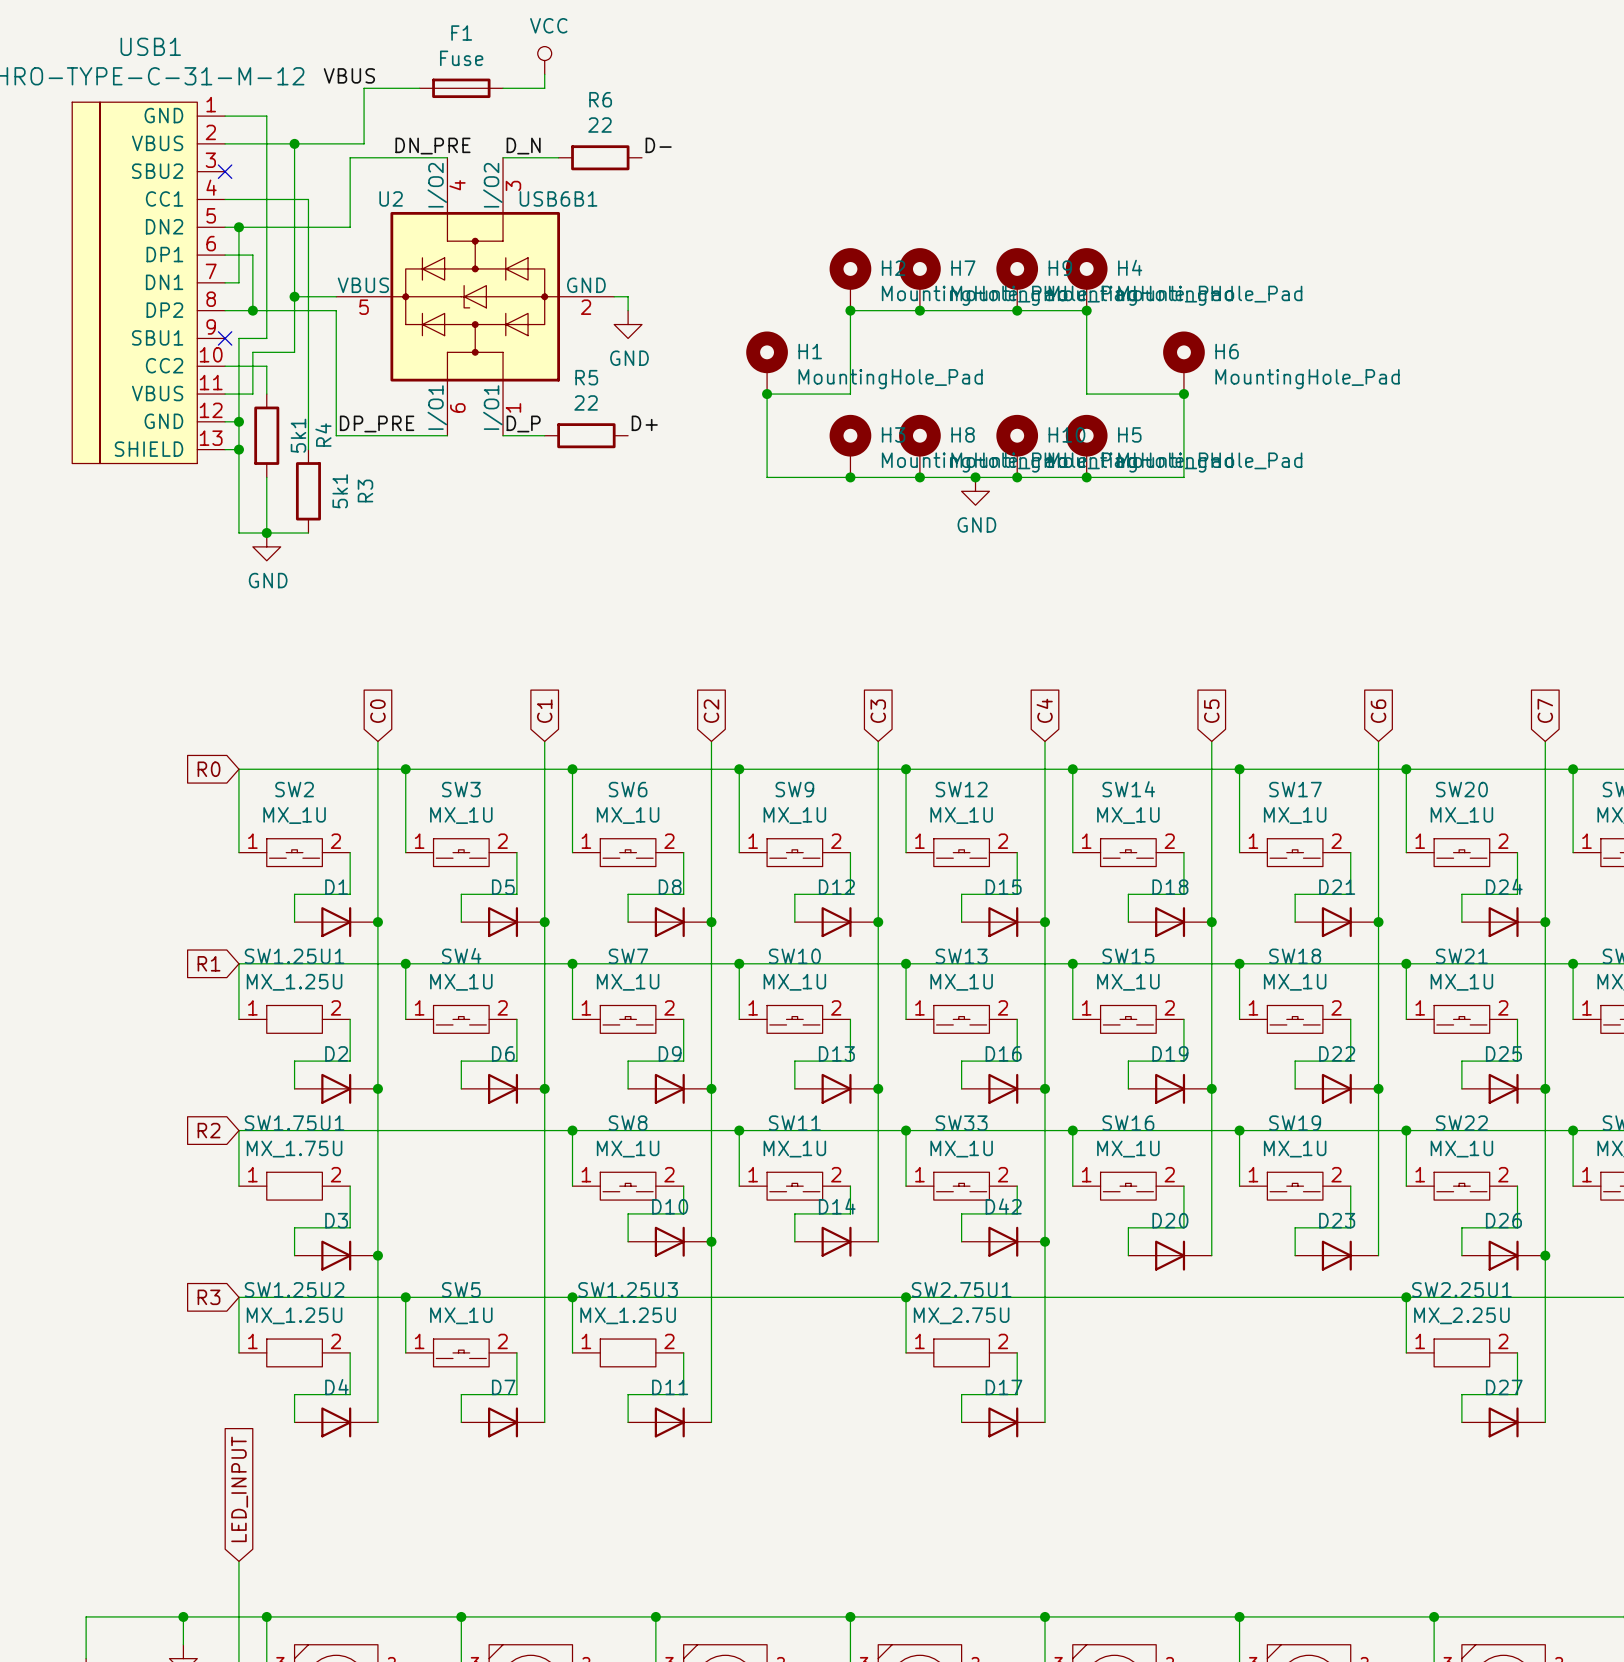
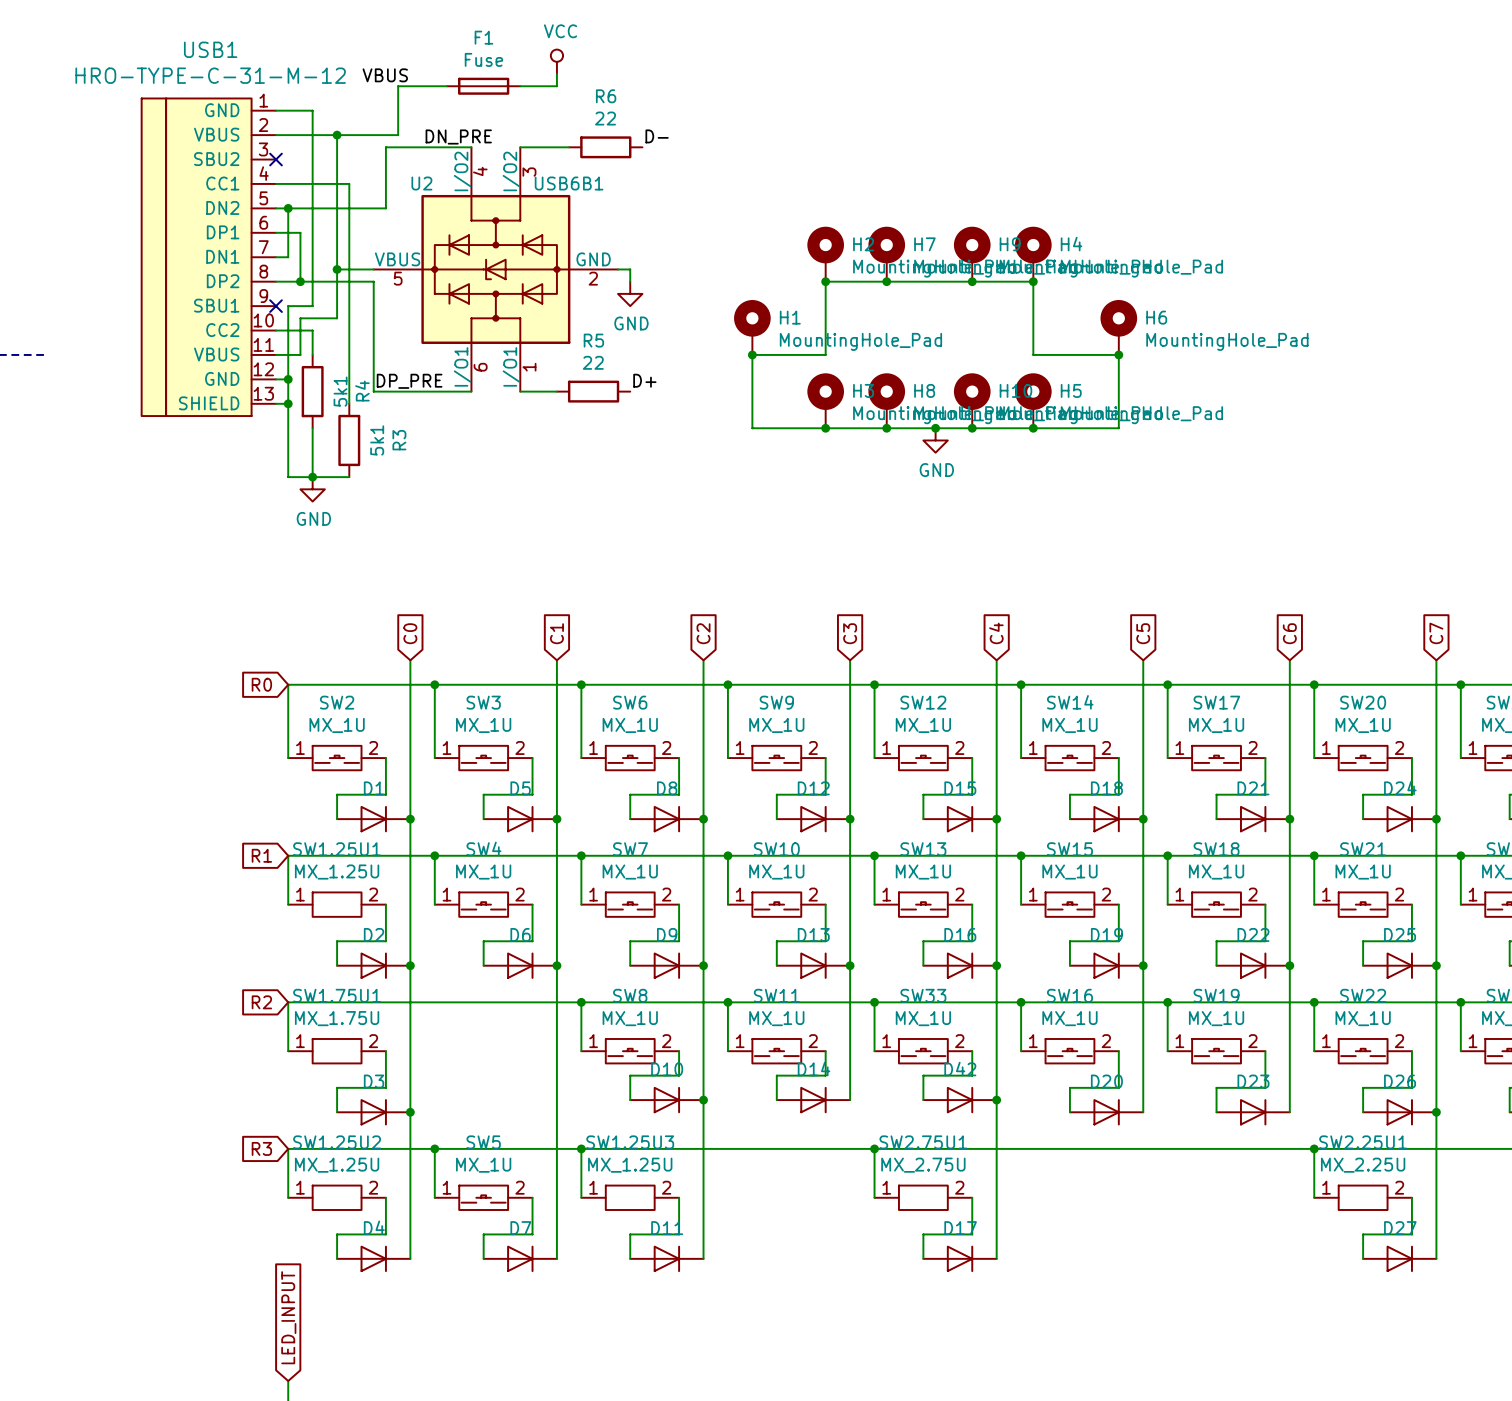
label: D_N (523, 146) -> none
label: D_P (523, 423) -> none

